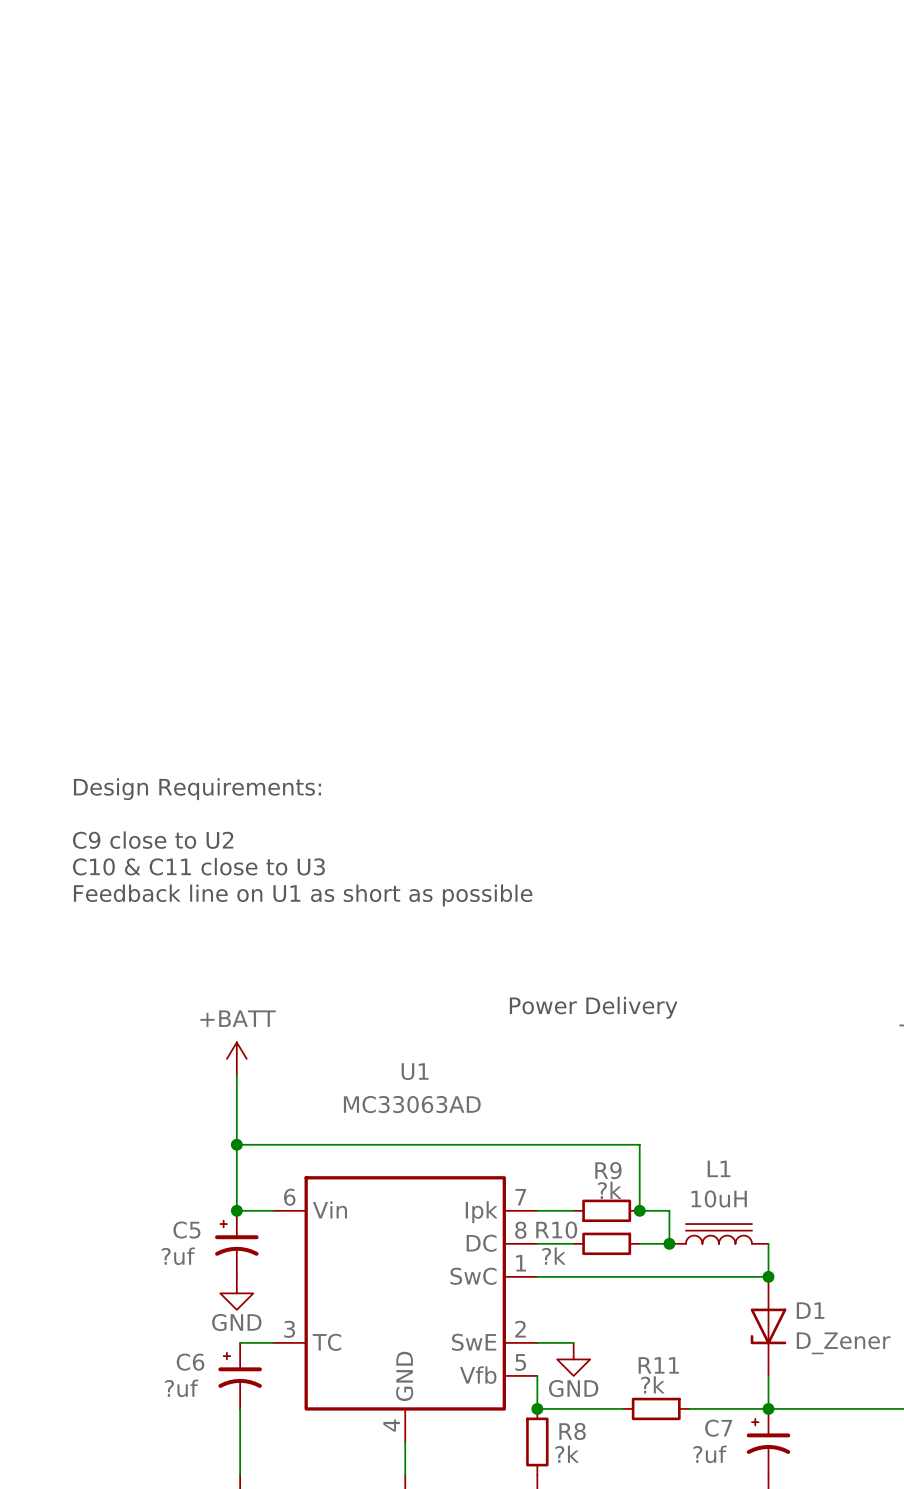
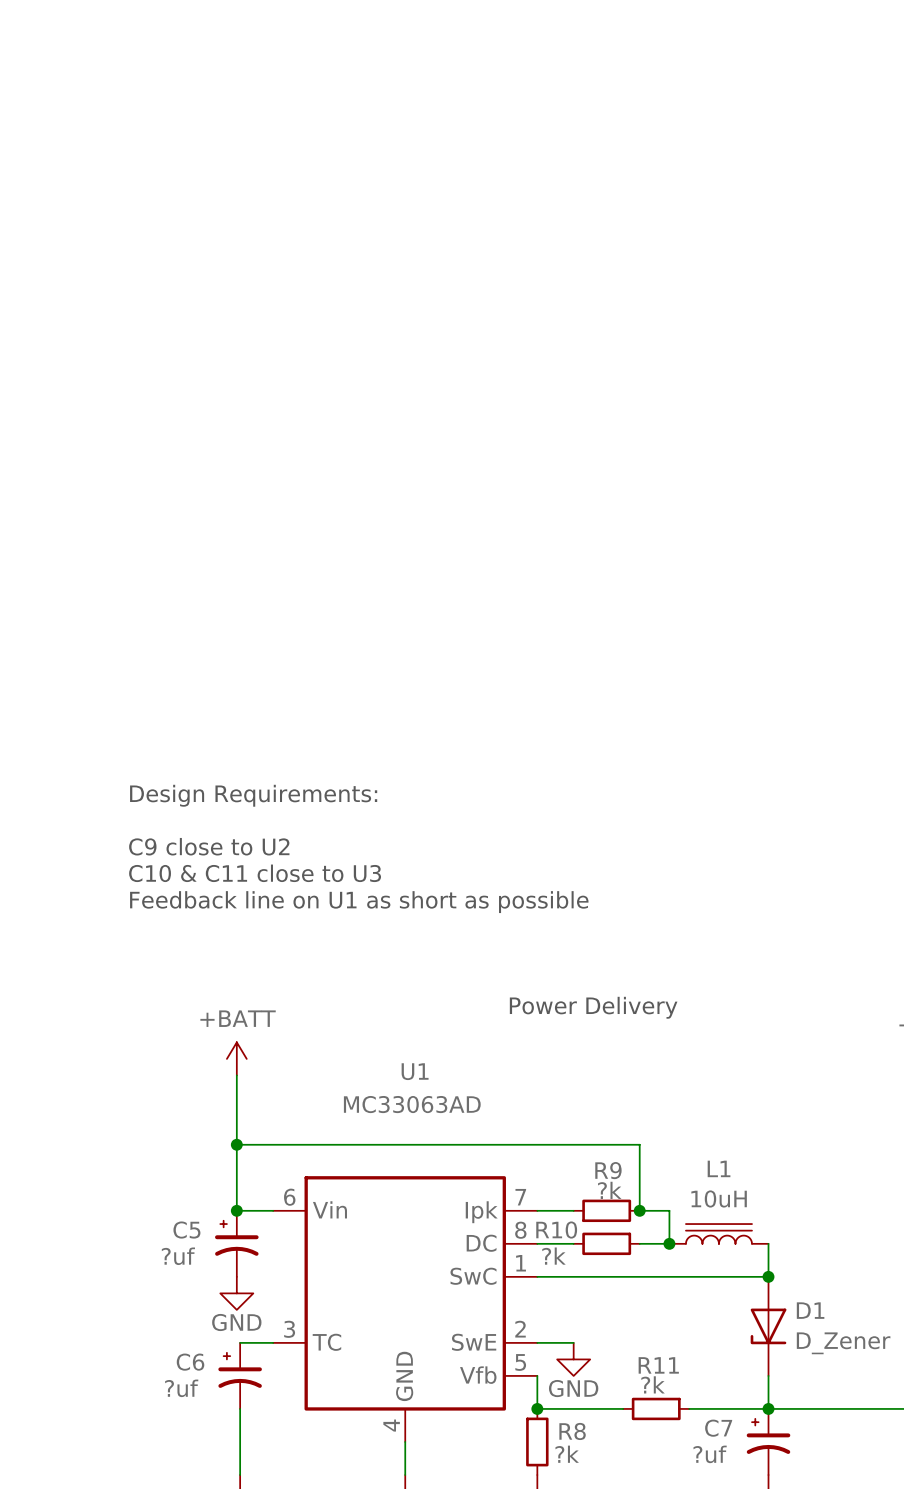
text position: Design Requirements: (197, 789) -> Design Requirements: (253, 795)
text position: C9 close to U2 (153, 840) -> C9 close to U2 (209, 846)
text position: C10 & C11 close to U3 (198, 866) -> C10 & C11 close to U3 (255, 873)
text position: Feedback line on U1 as short as possible (303, 895) -> Feedback line on U1 as short as possible (359, 902)

